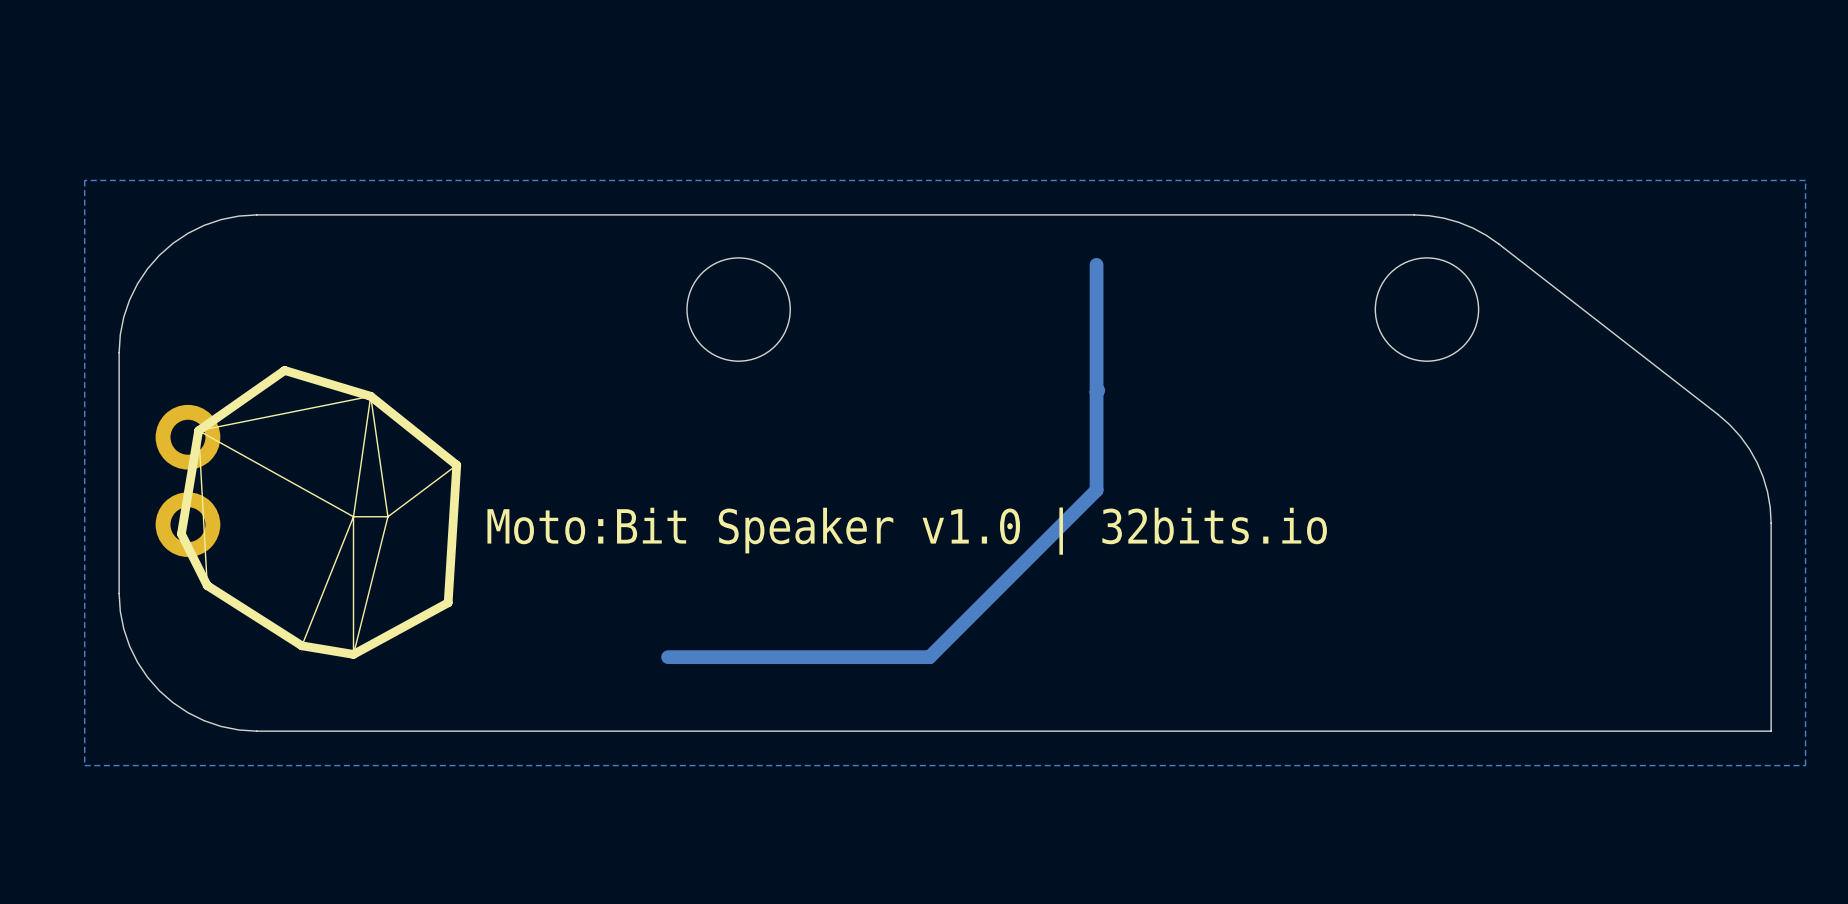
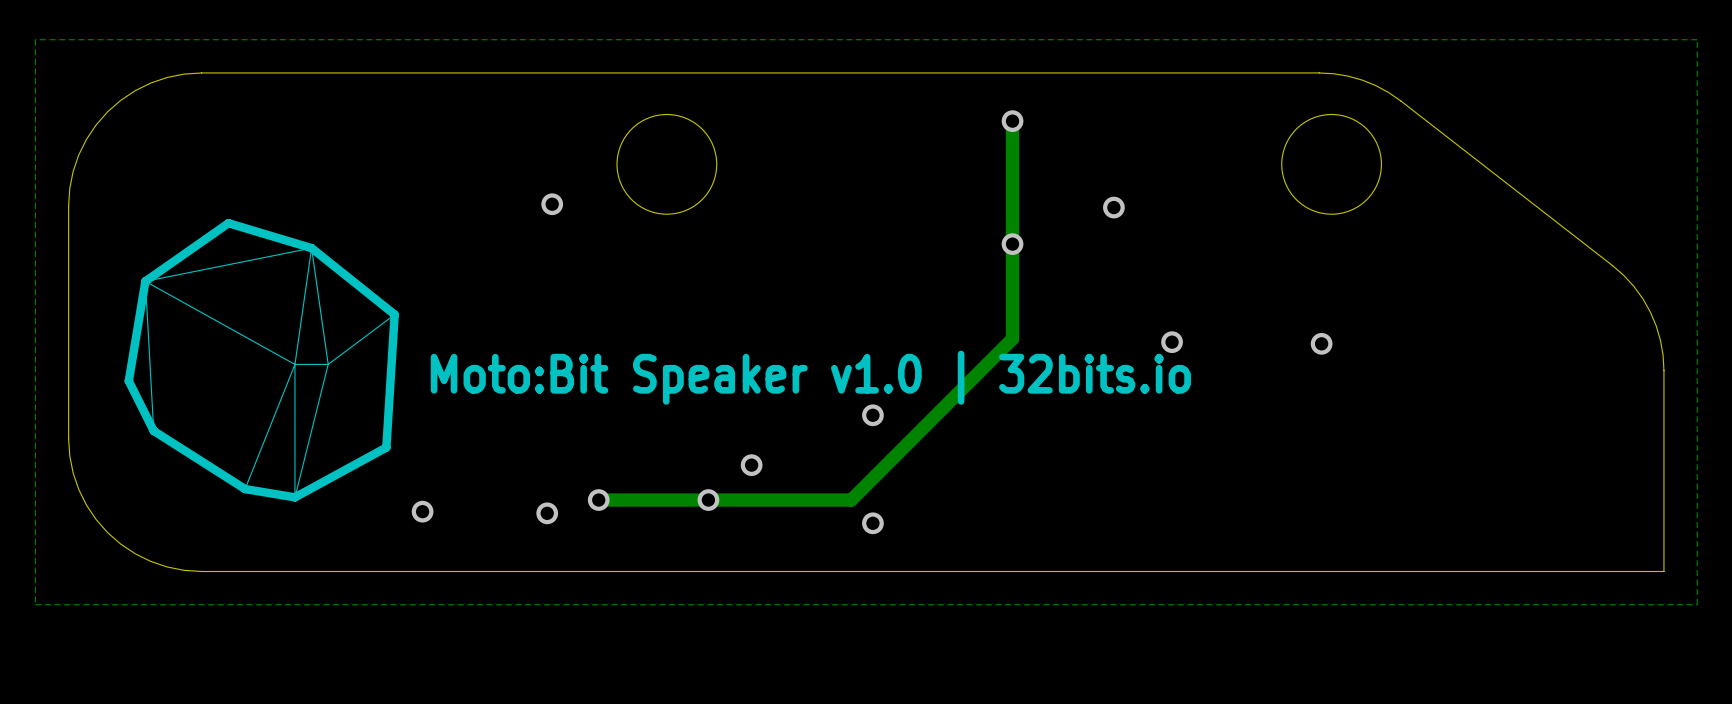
via: none -> (1012, 121)
via: none -> (552, 204)
via: none -> (1113, 207)
via: none -> (1012, 244)
part: (187, 480) -> none
via: none -> (1172, 342)
via: none -> (1321, 343)
via: none -> (872, 415)
via: none -> (751, 465)
via: none -> (598, 500)
via: none -> (708, 500)
via: none -> (422, 511)
via: none -> (547, 513)
via: none -> (872, 523)

